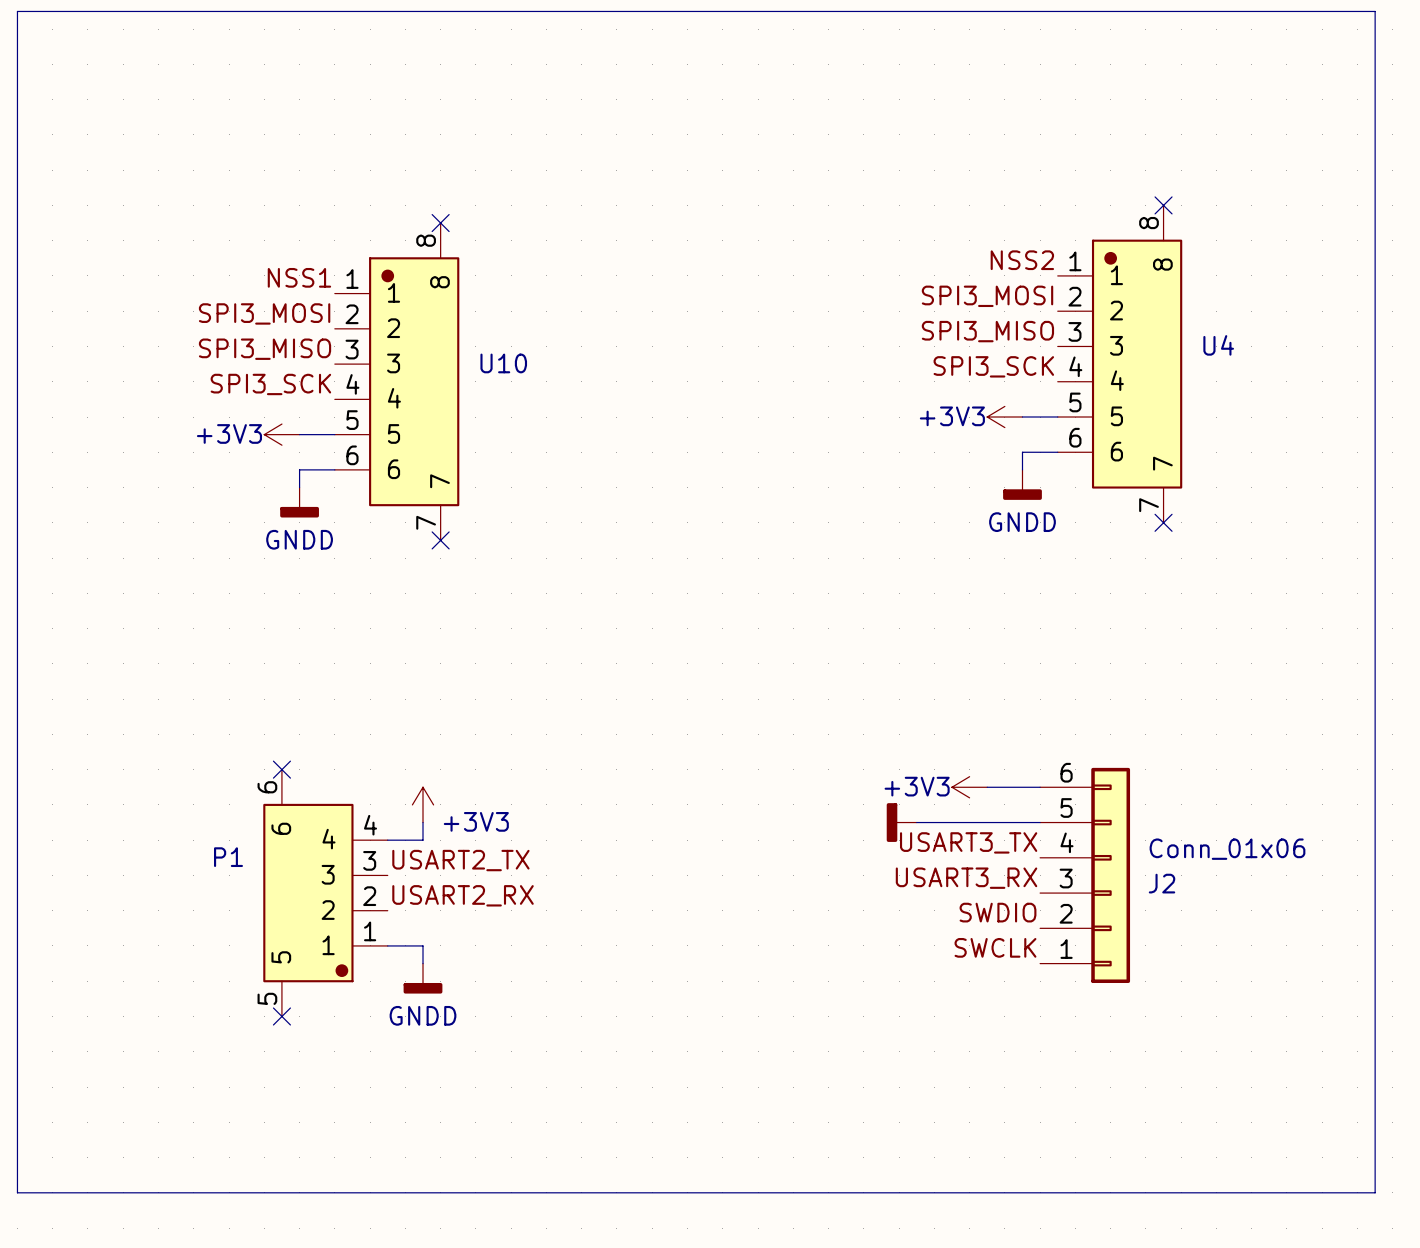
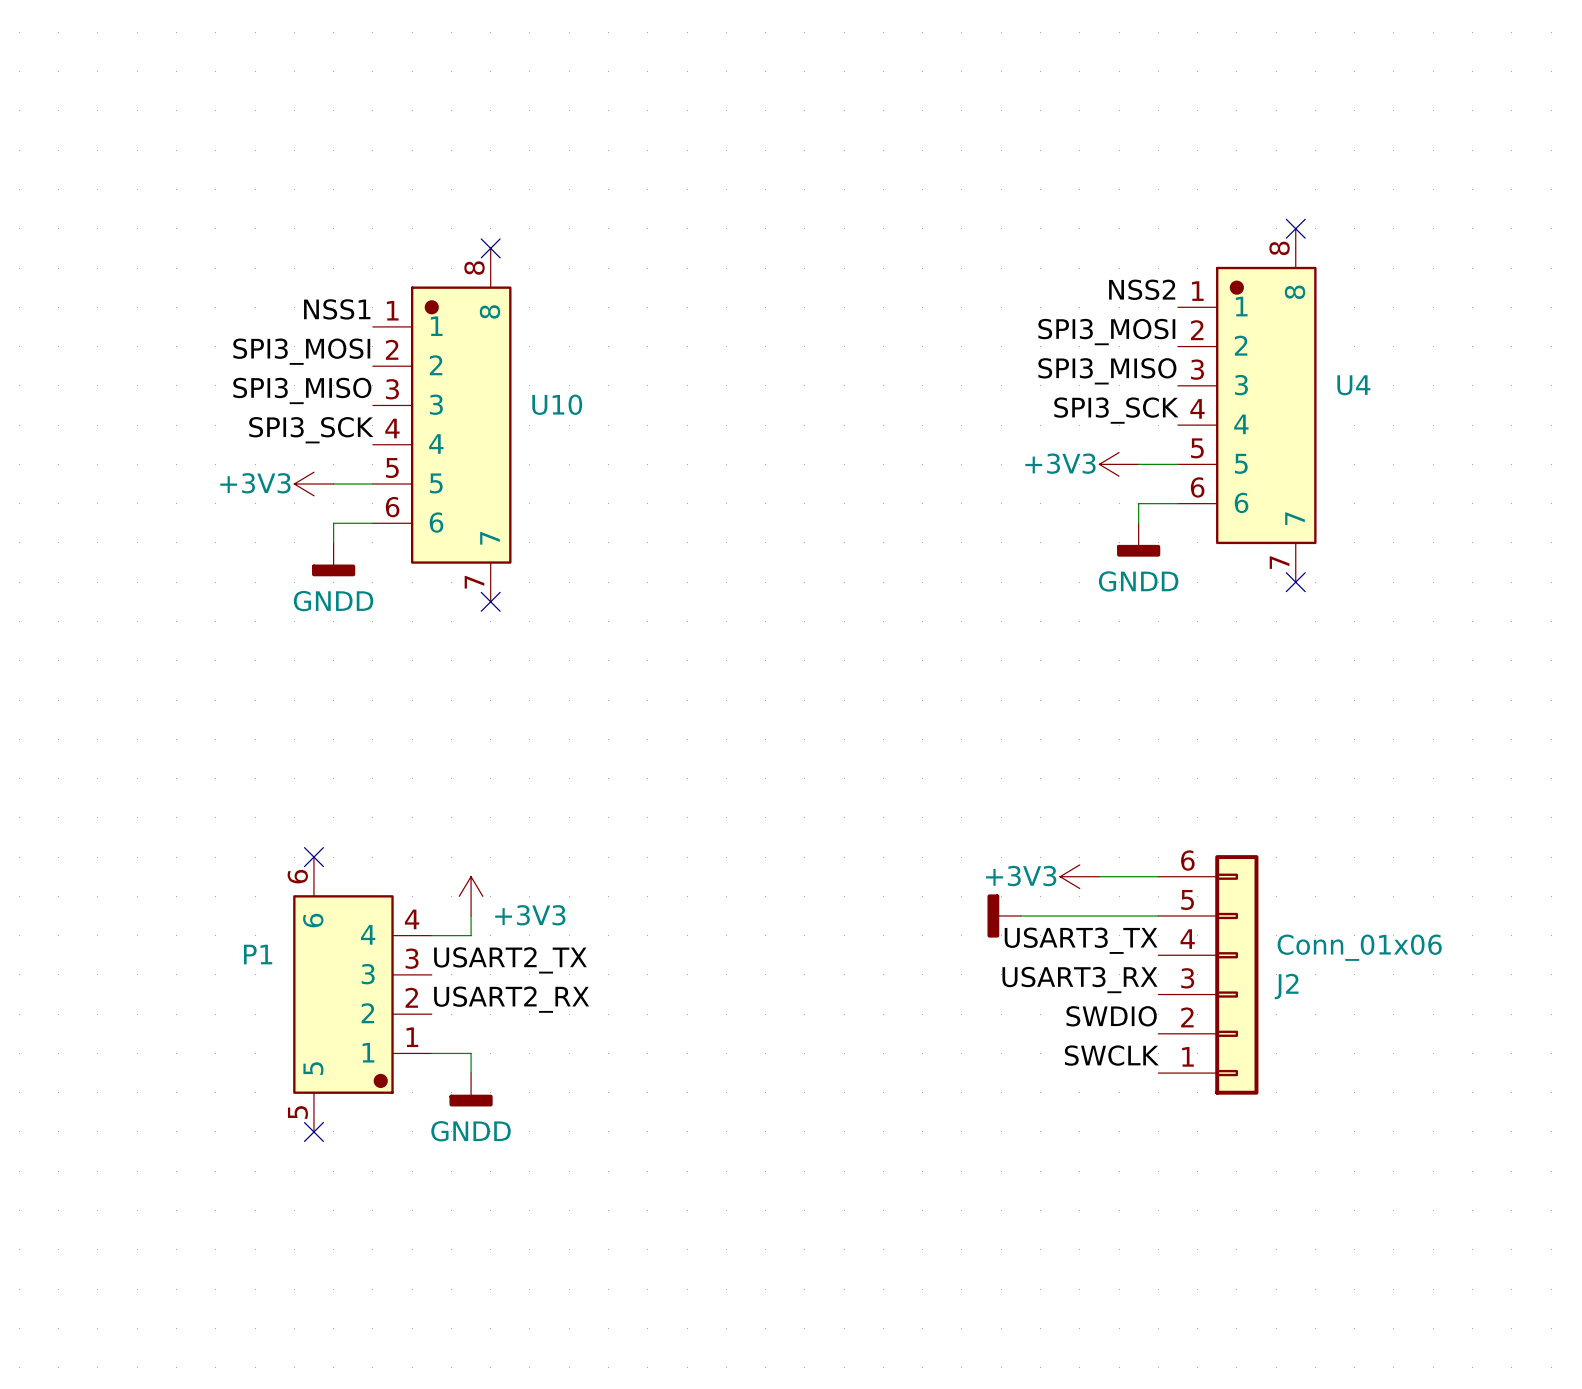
line: (17, 11) (1375, 11) (1375, 1192) (17, 1192) (17, 11) -> none

